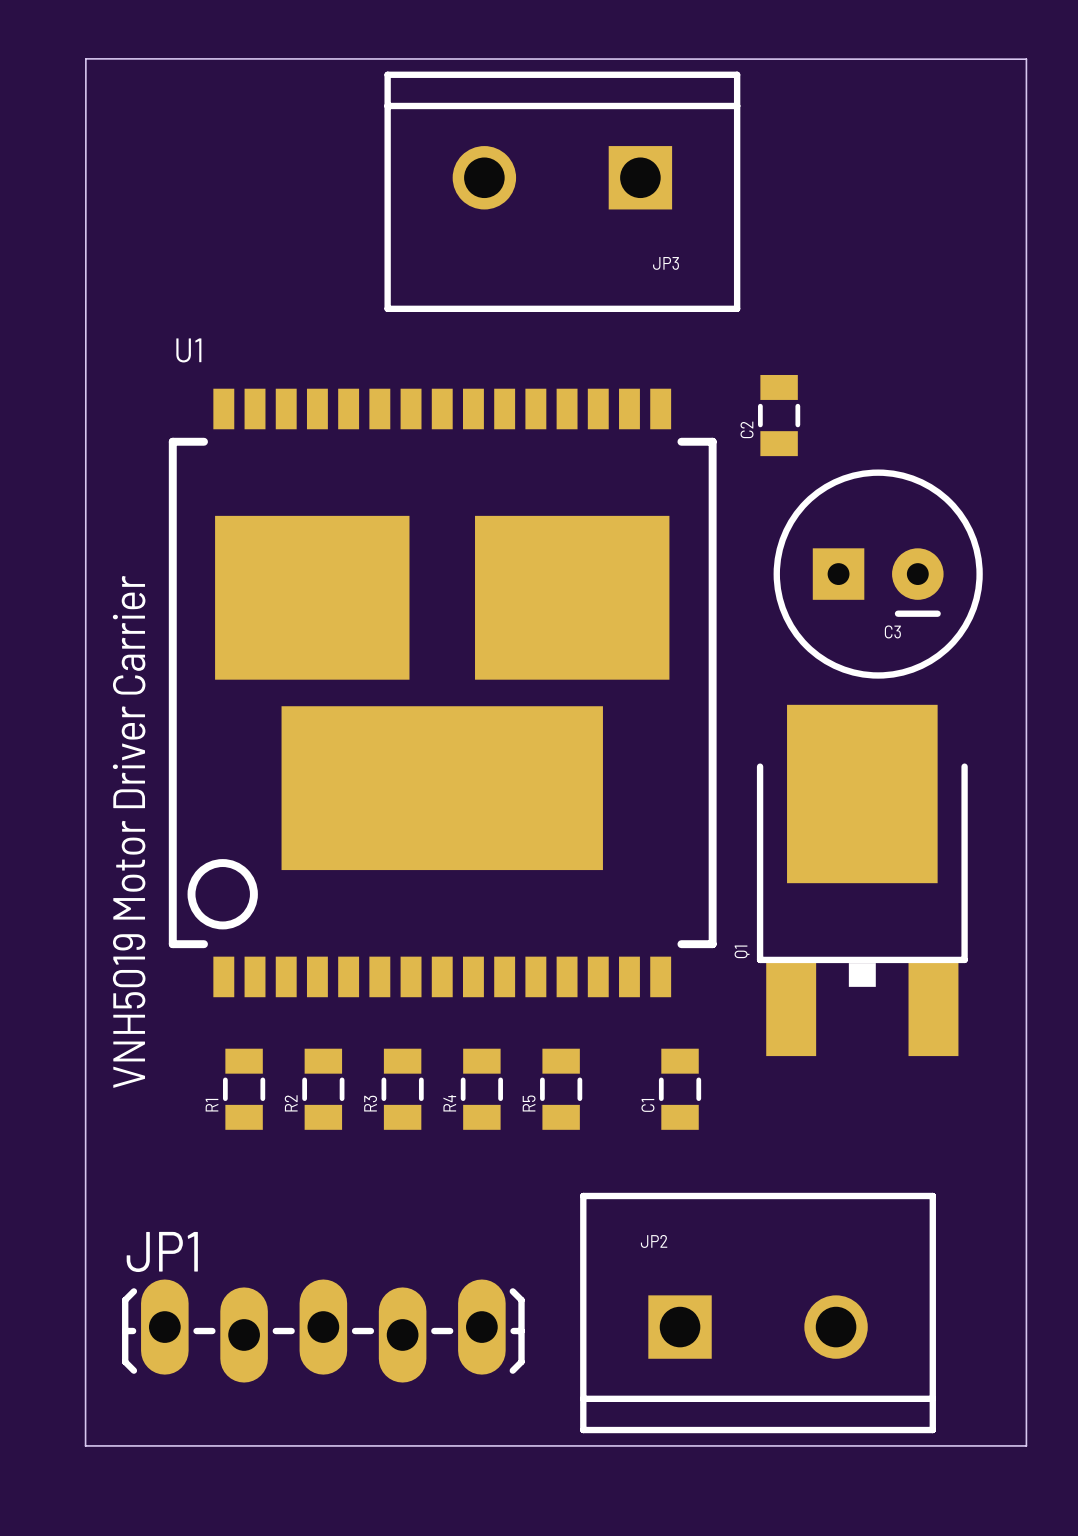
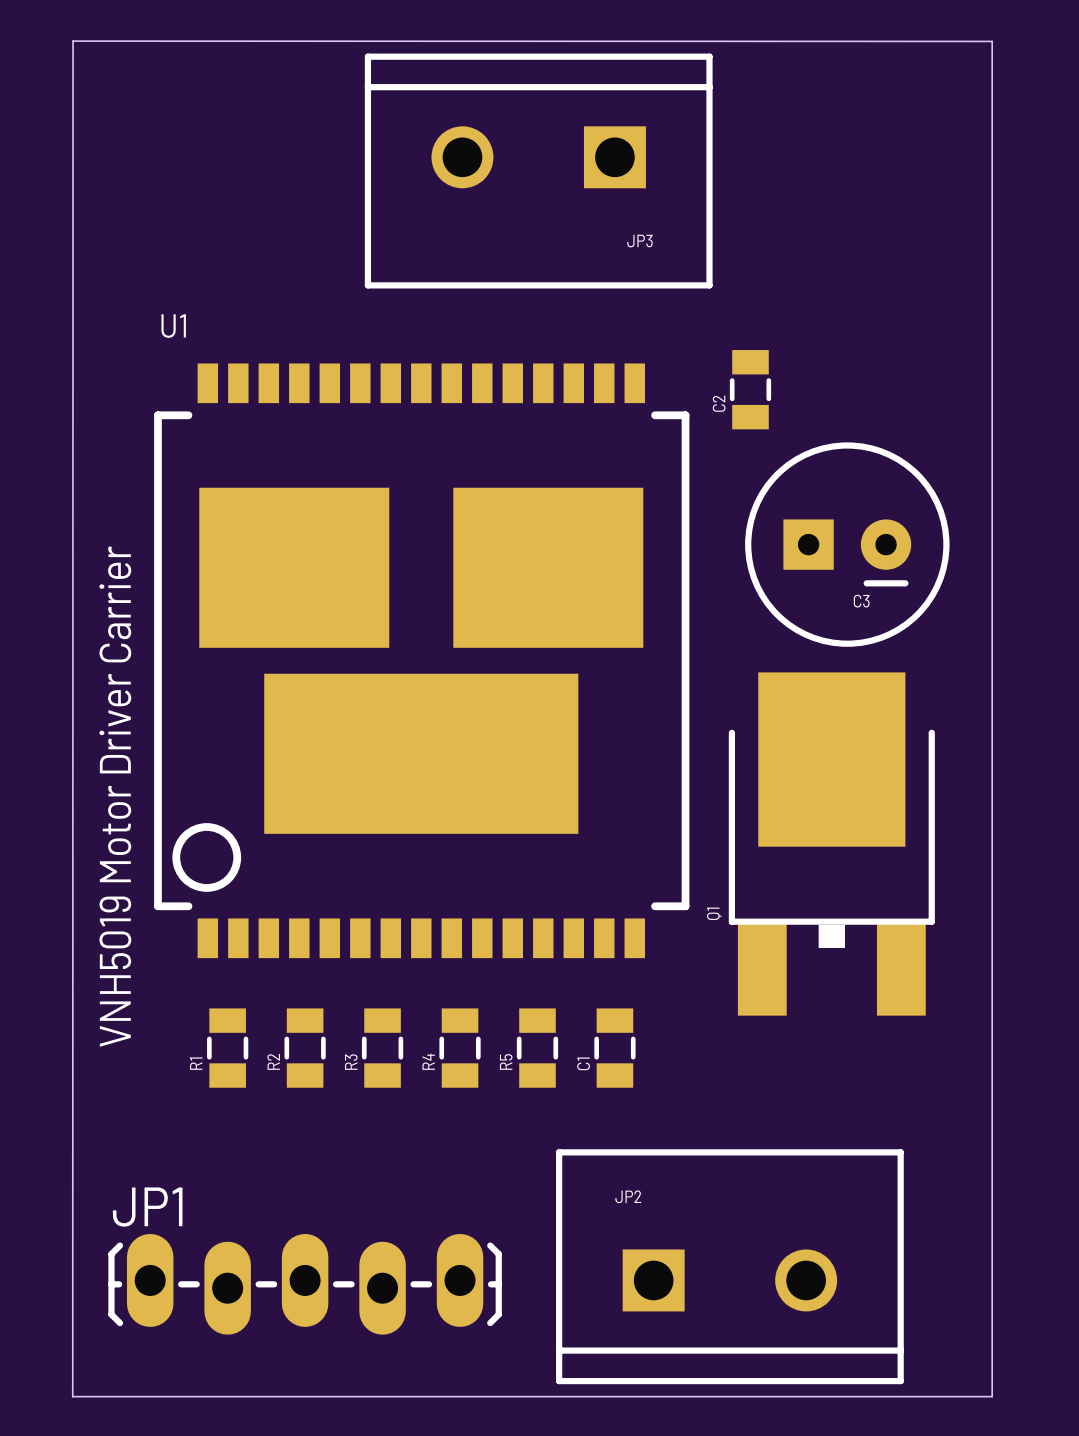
C1 position: (680, 1089) -> (614, 1048)

